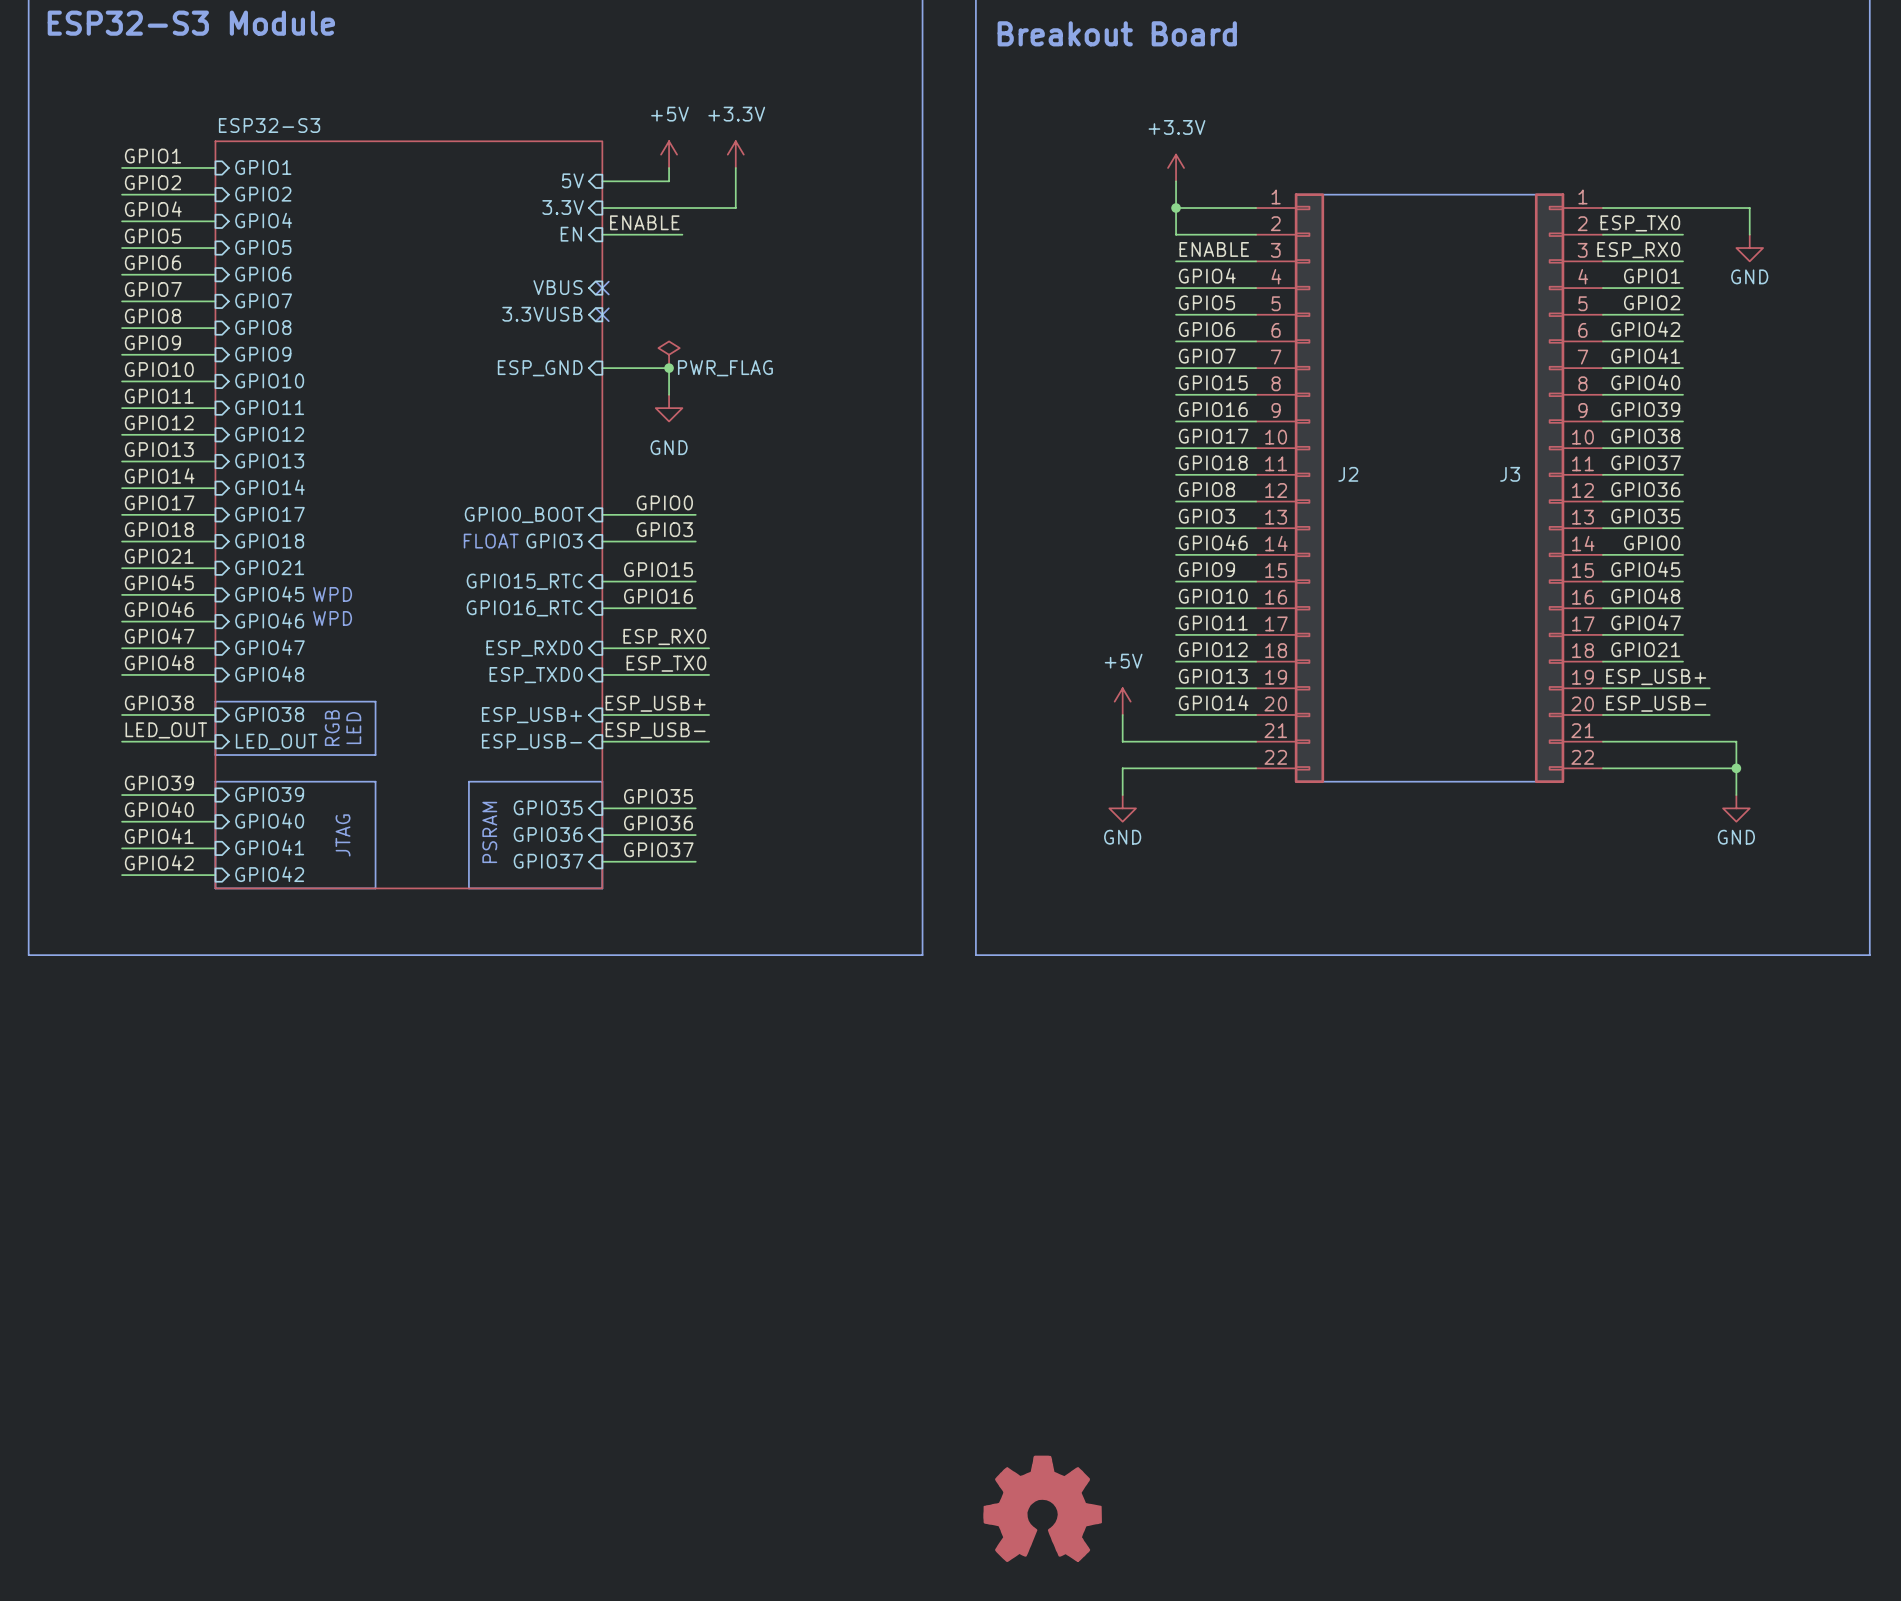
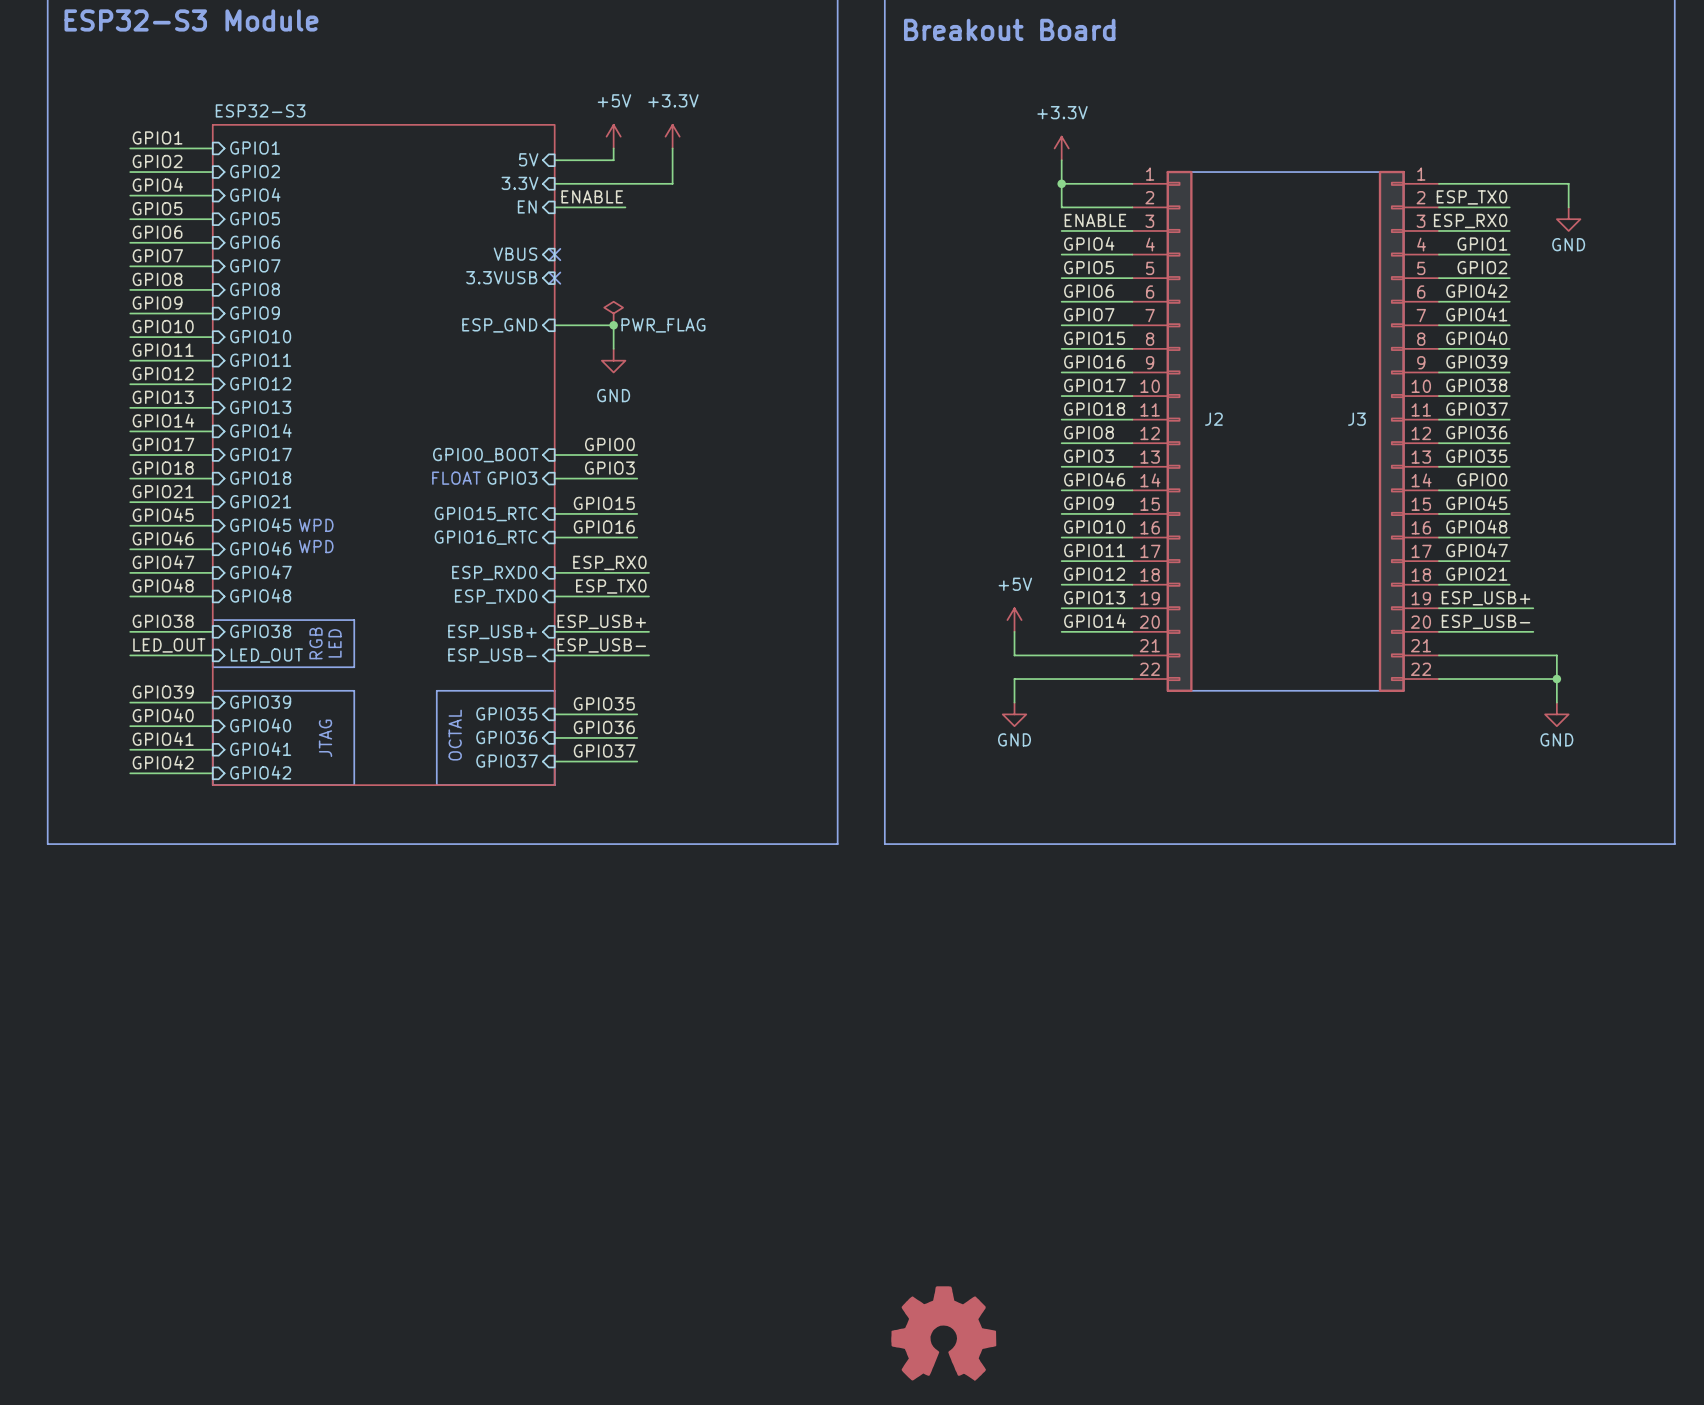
text: PSRAM (489, 832) -> OCTAL (455, 735)

